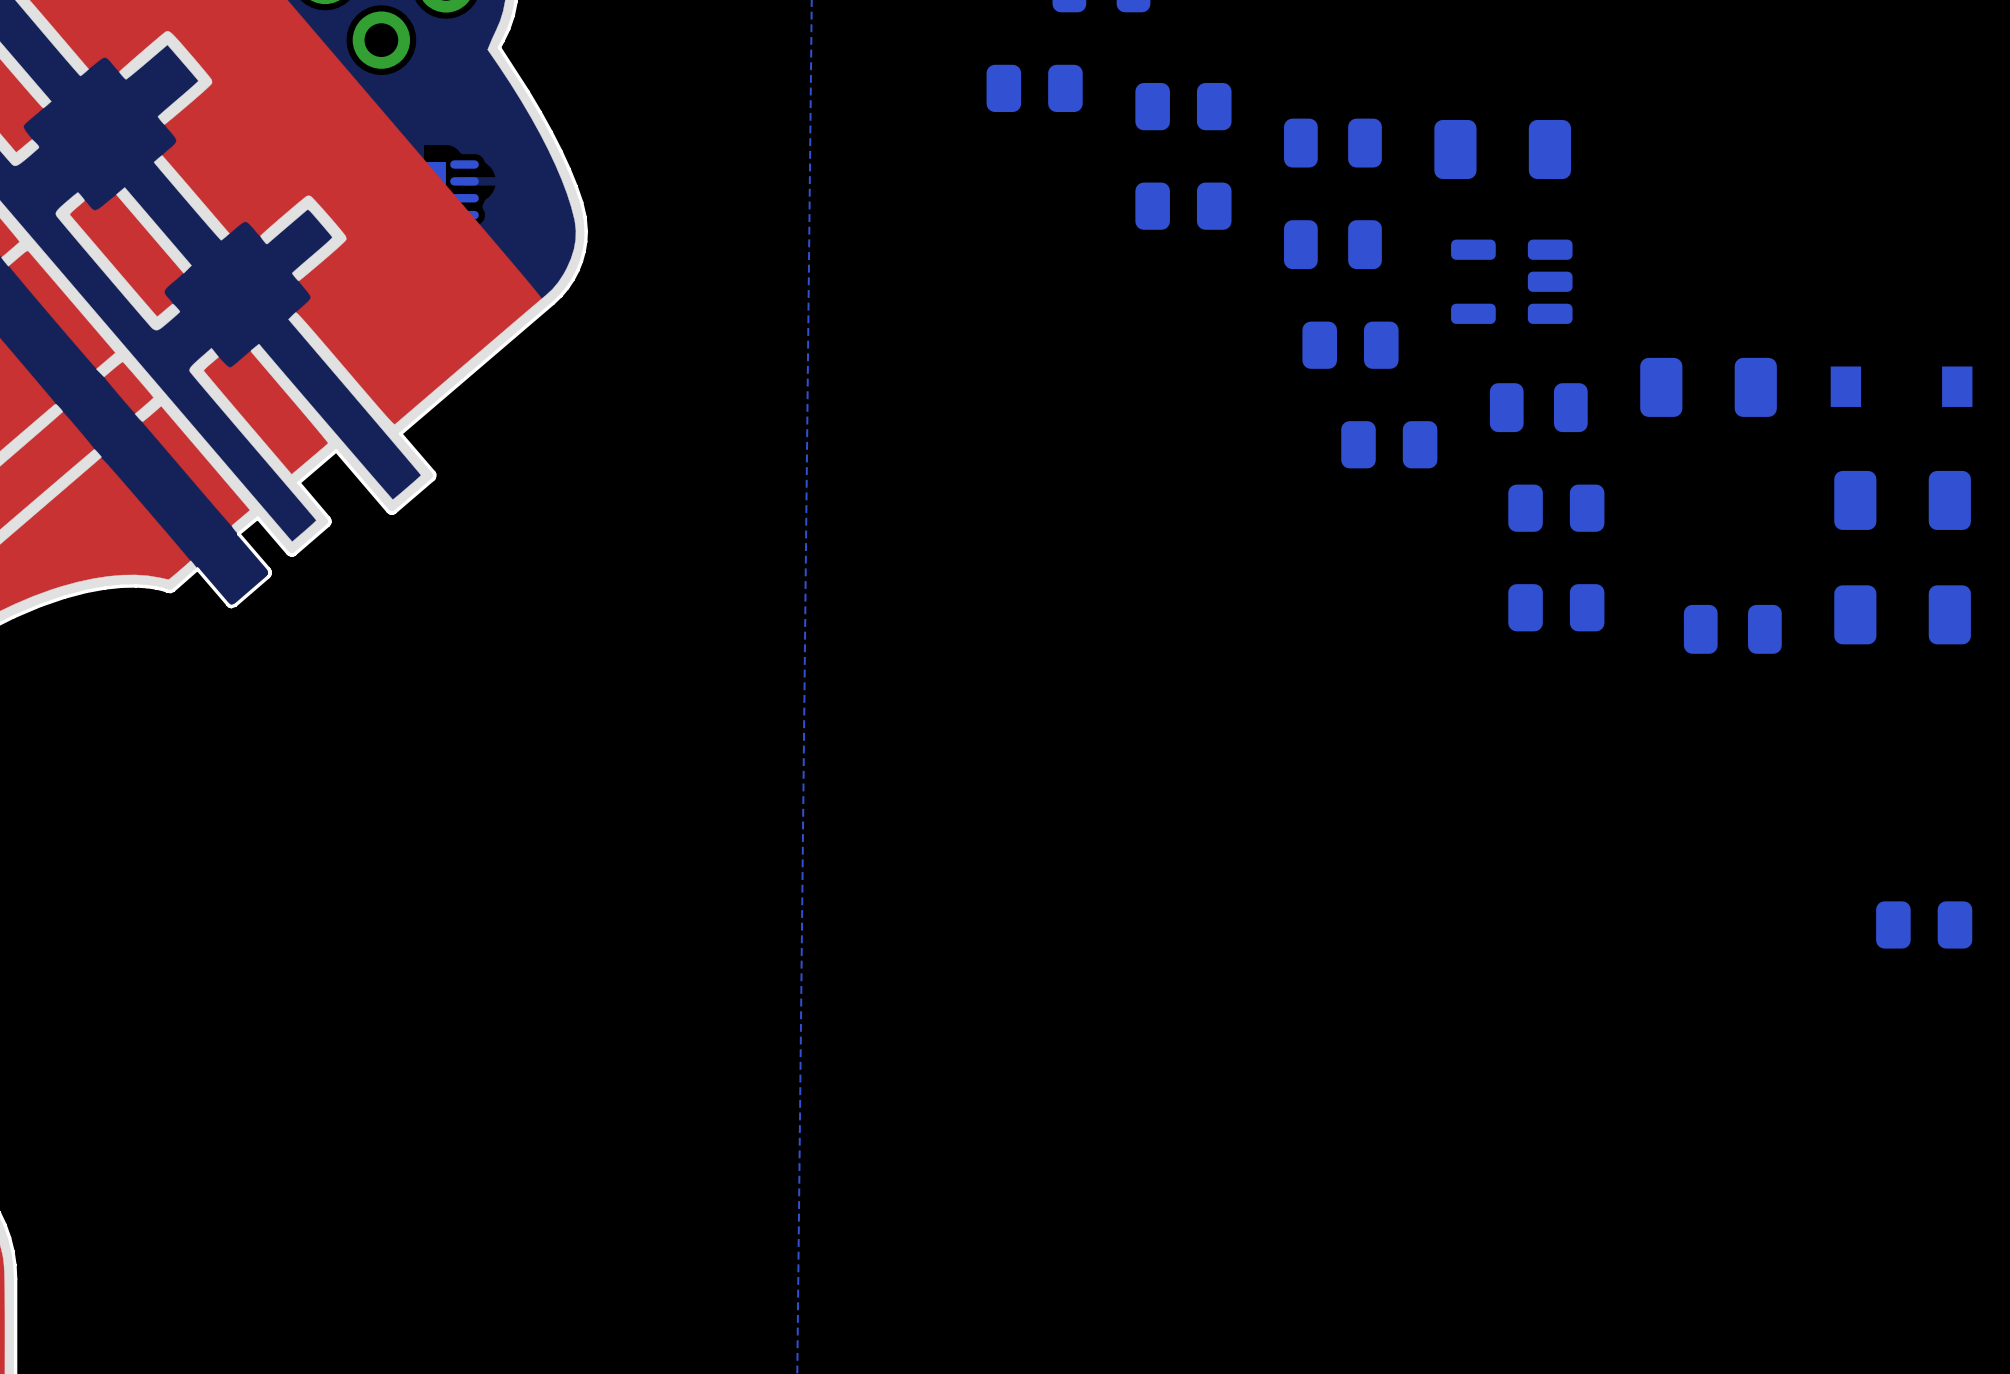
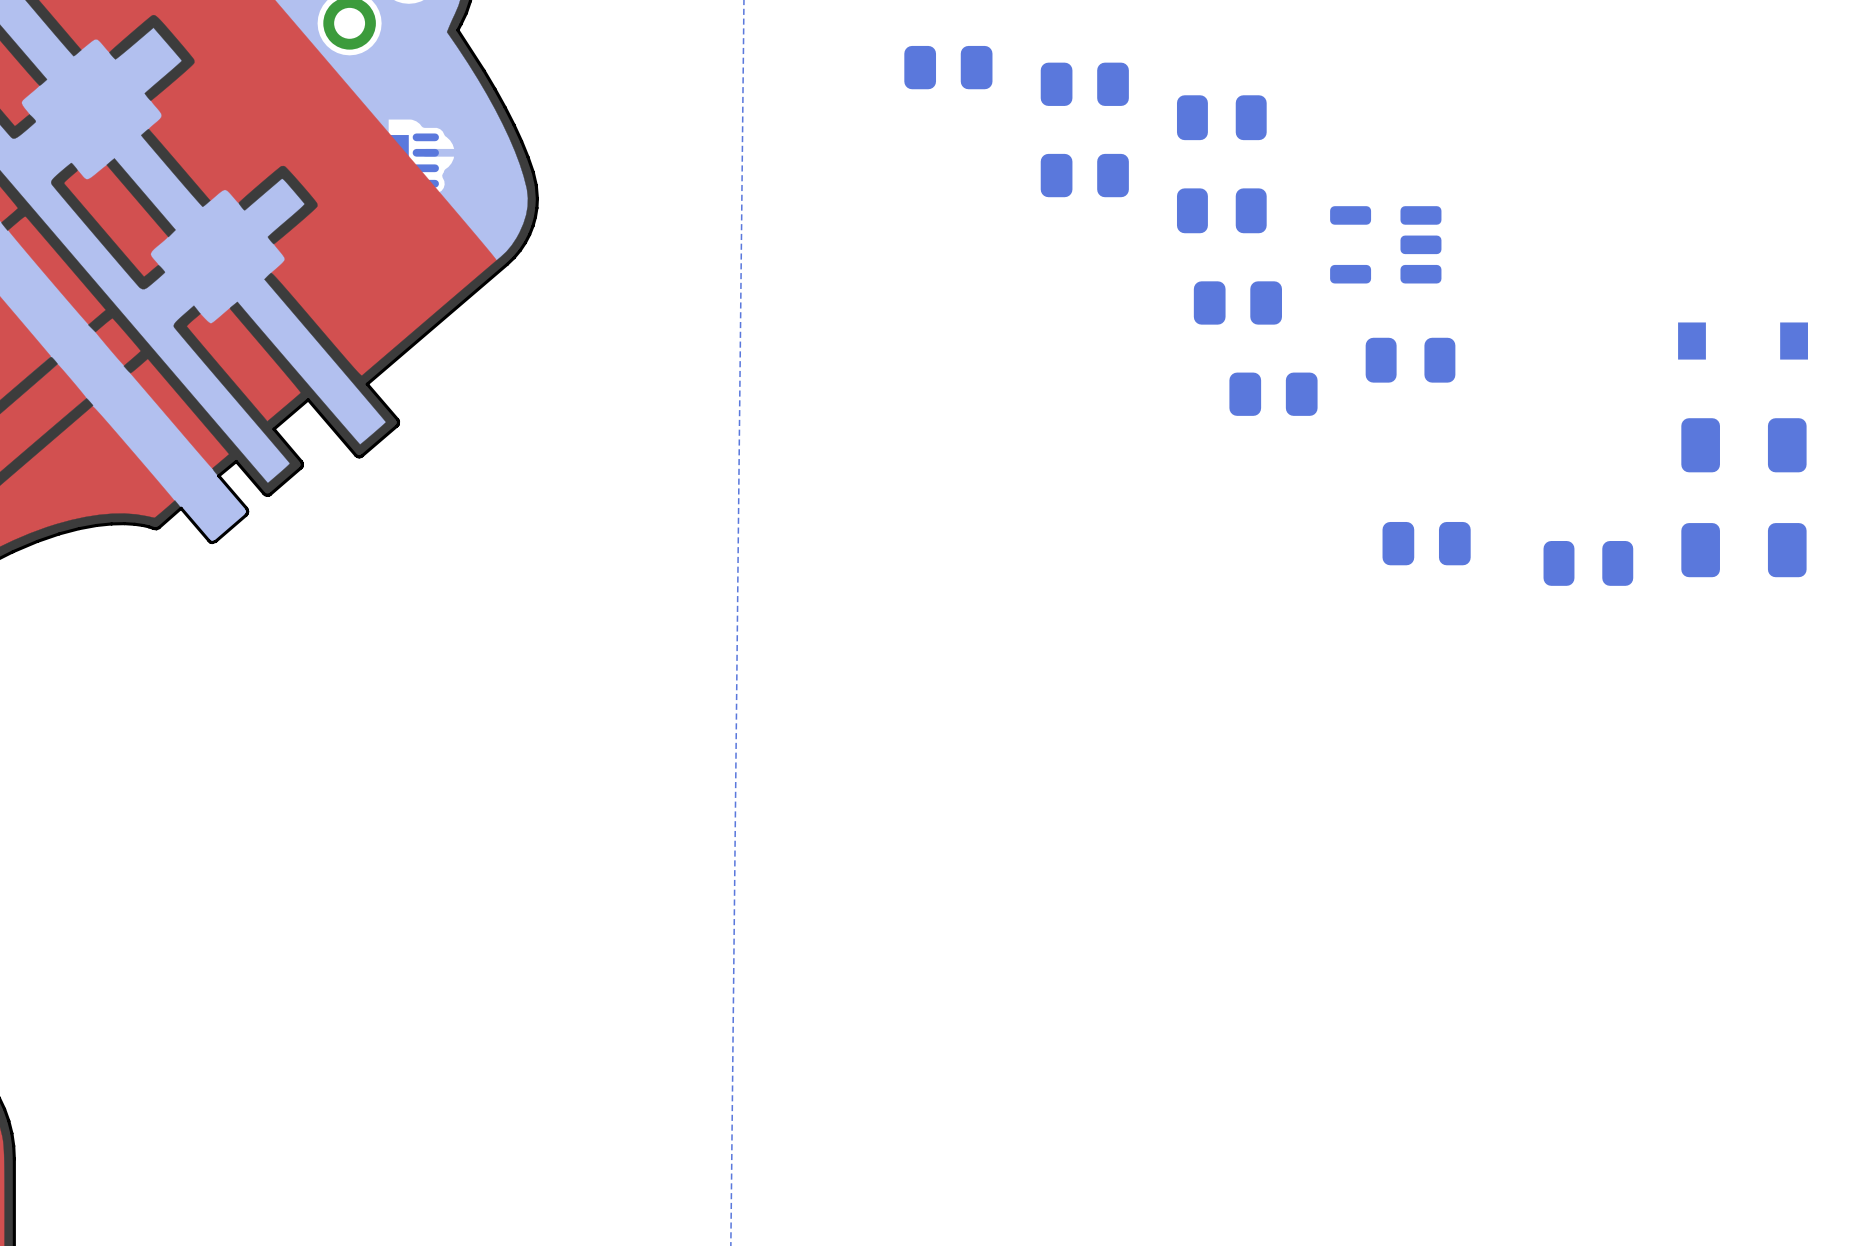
part: (1502, 149) -> none
part: (1708, 387) -> none
part: (1556, 508) -> none
part: (1924, 924) -> none

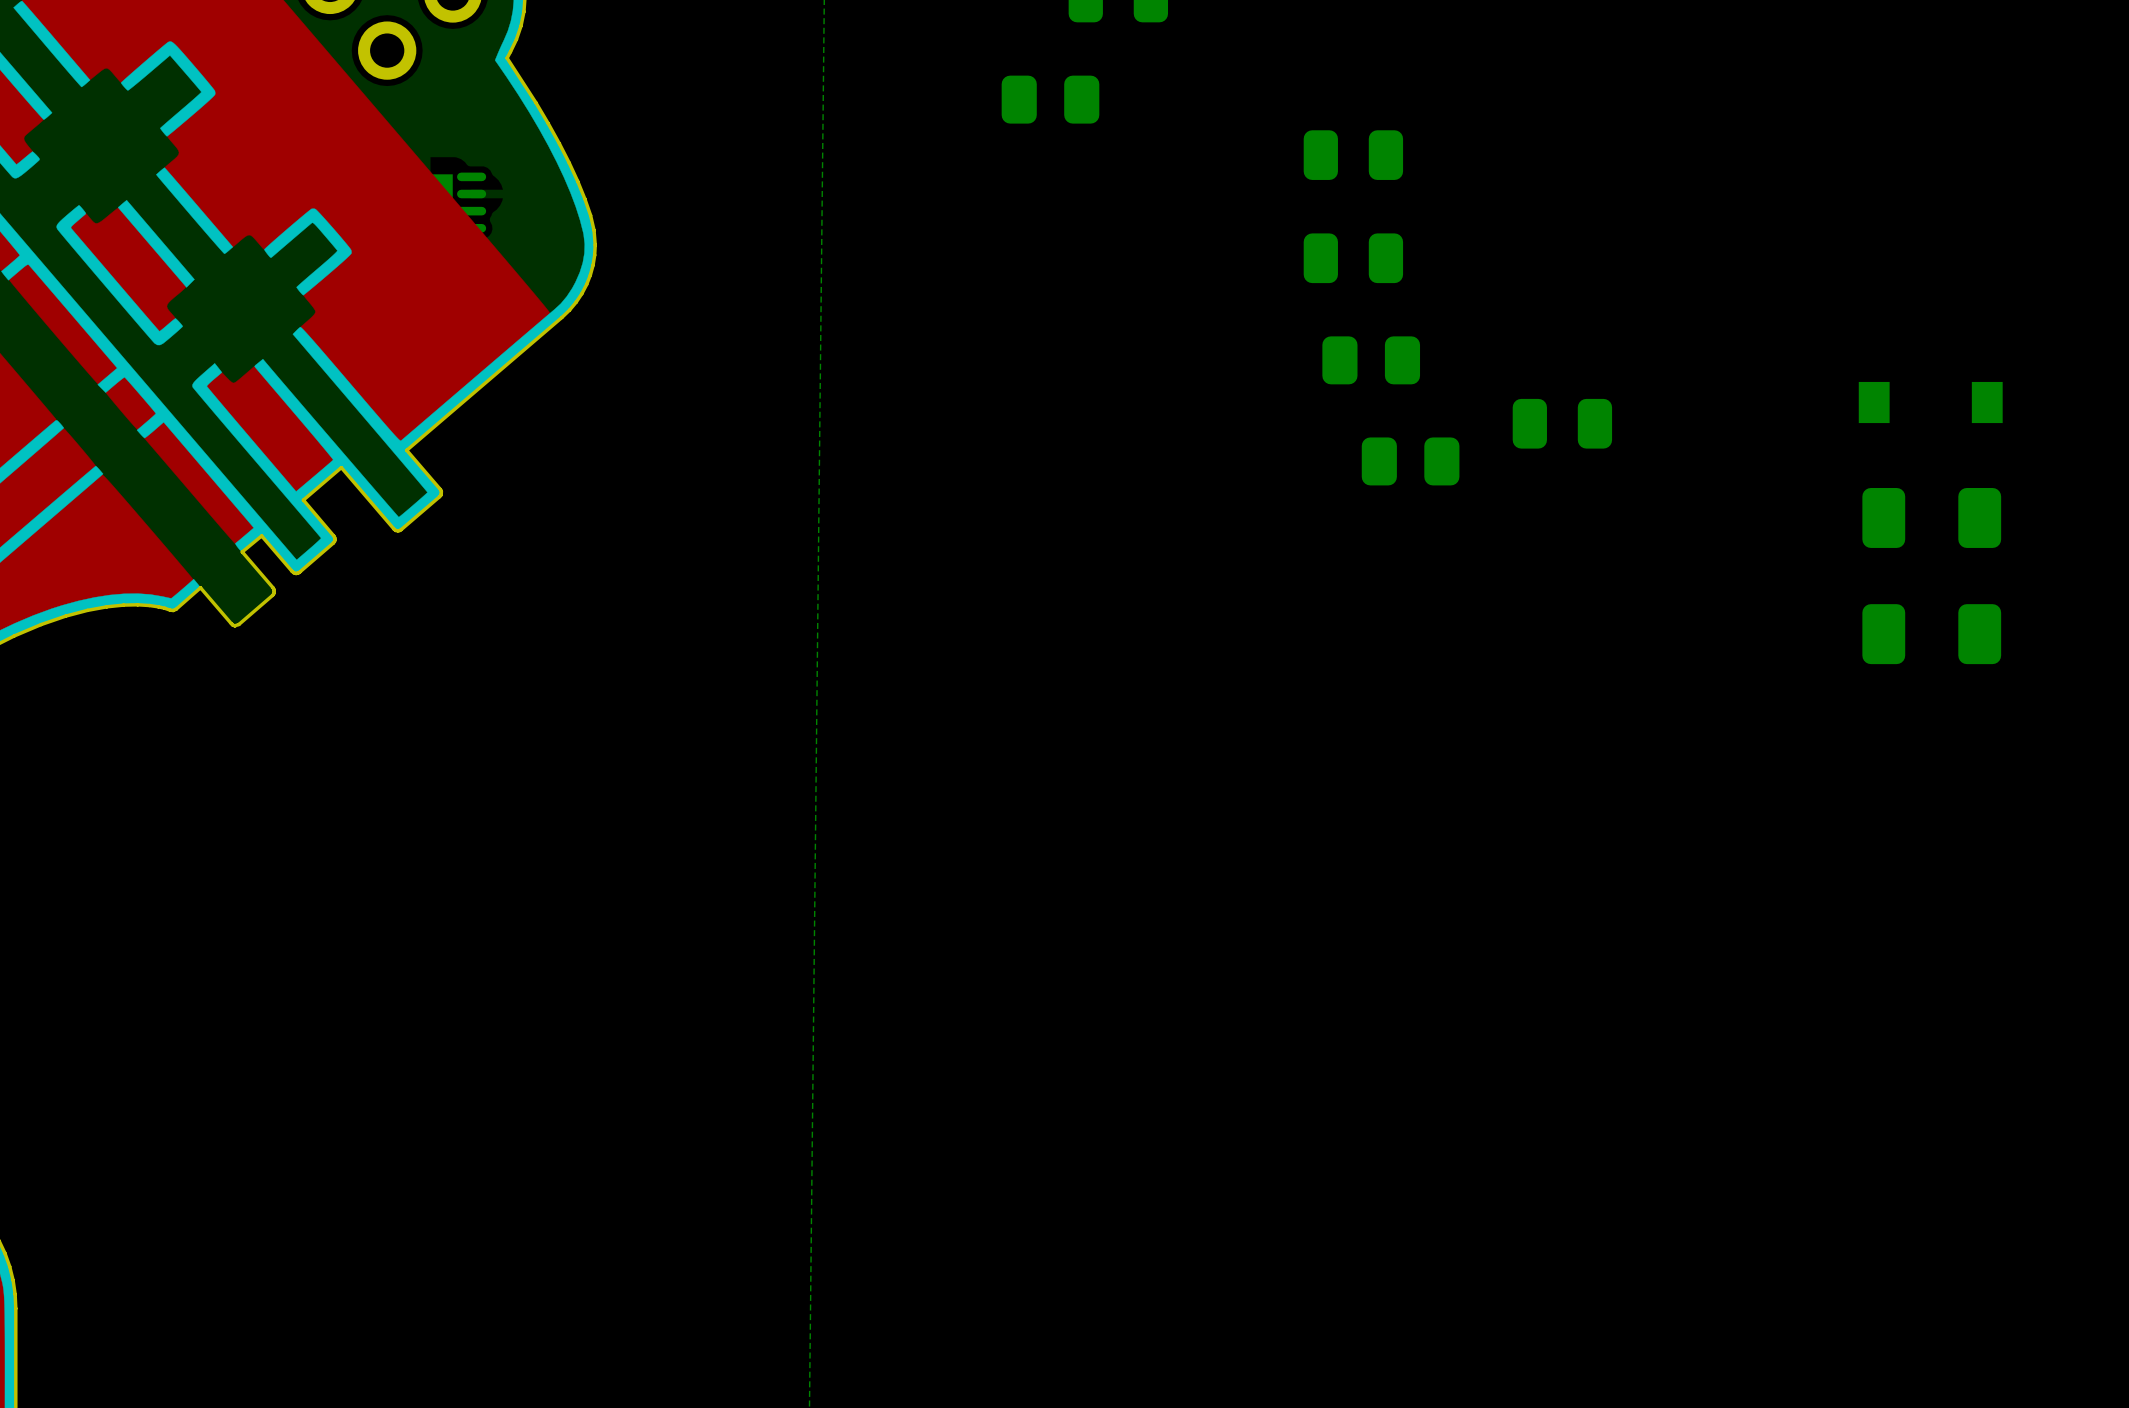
part: (1084, 84) -> none
part: (1084, 175) -> none
part: (1385, 244) -> none
part: (1426, 543) -> none
part: (1588, 563) -> none

